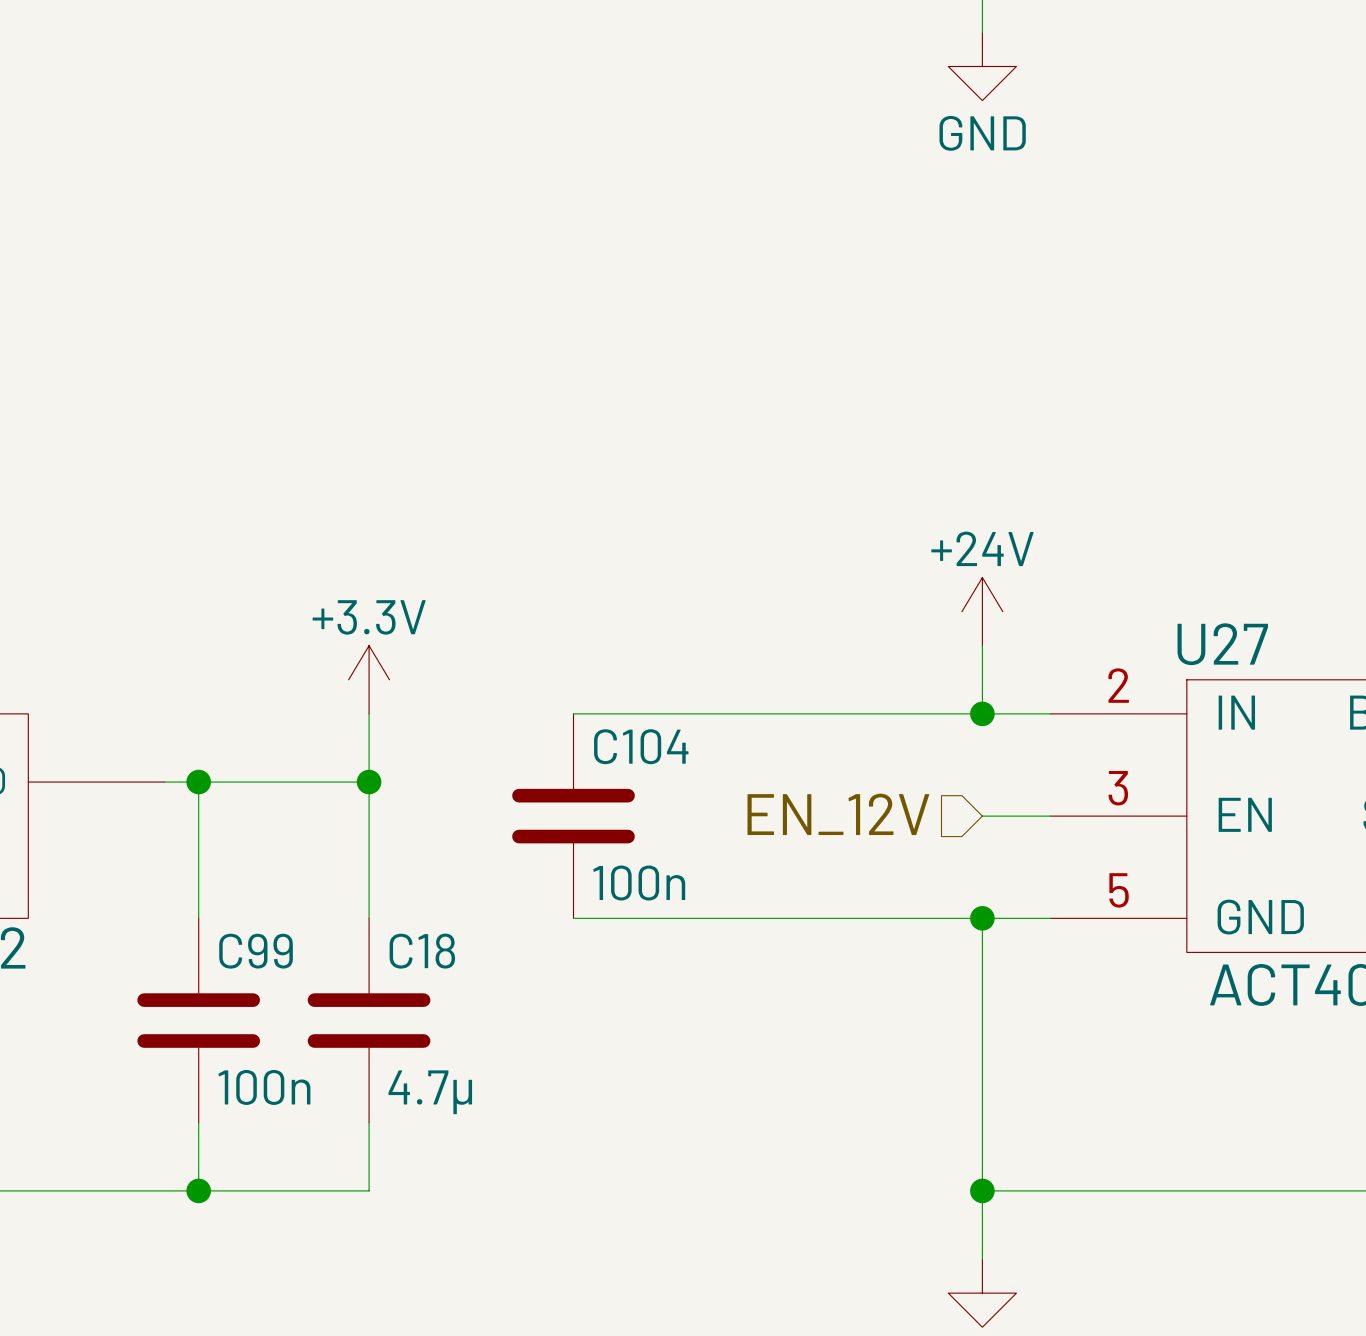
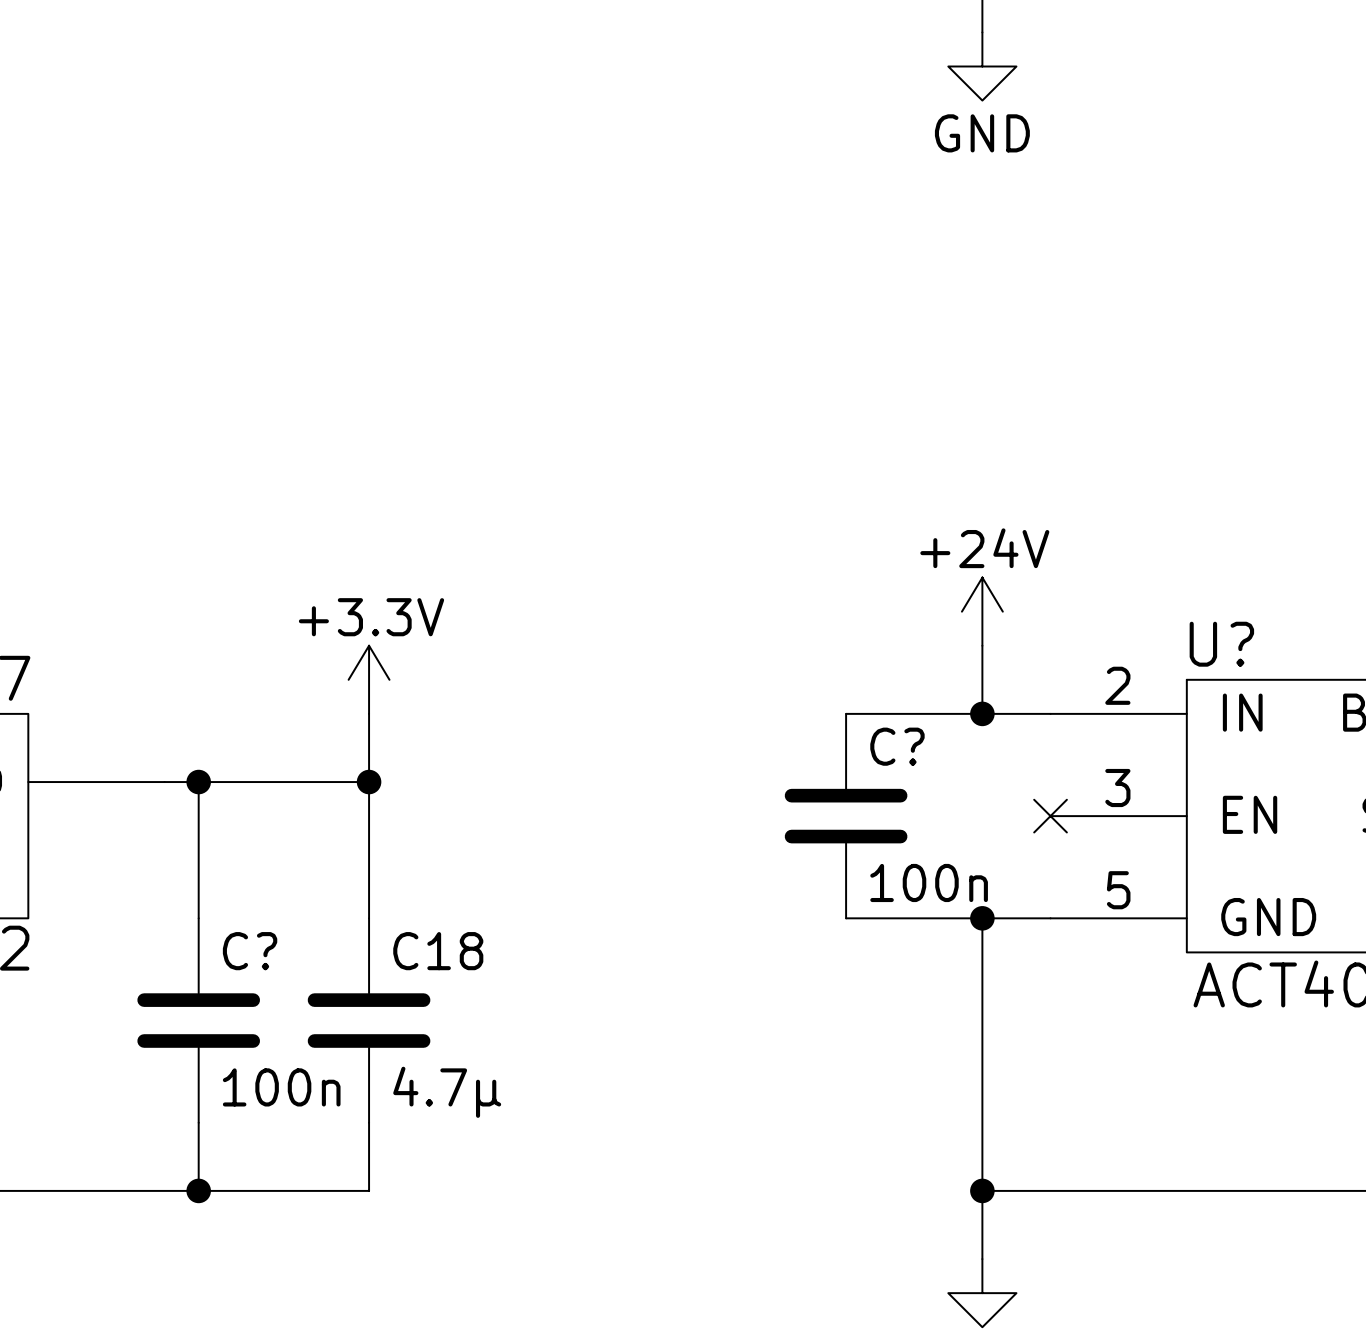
U27 name: U27 (1222, 644) -> U? (1221, 644)
wire: (573, 713) (846, 713) -> none
hierarchical label: EN_12V (838, 814) -> none
C104: 100n (573, 816) -> none
C?: none -> 100n (846, 816)
wire: (982, 816) (1050, 816) -> none
no-connect mark: none -> (1050, 816)
wire: (573, 918) (846, 918) -> none
C99 name: C99 (256, 951) -> C? (250, 951)

